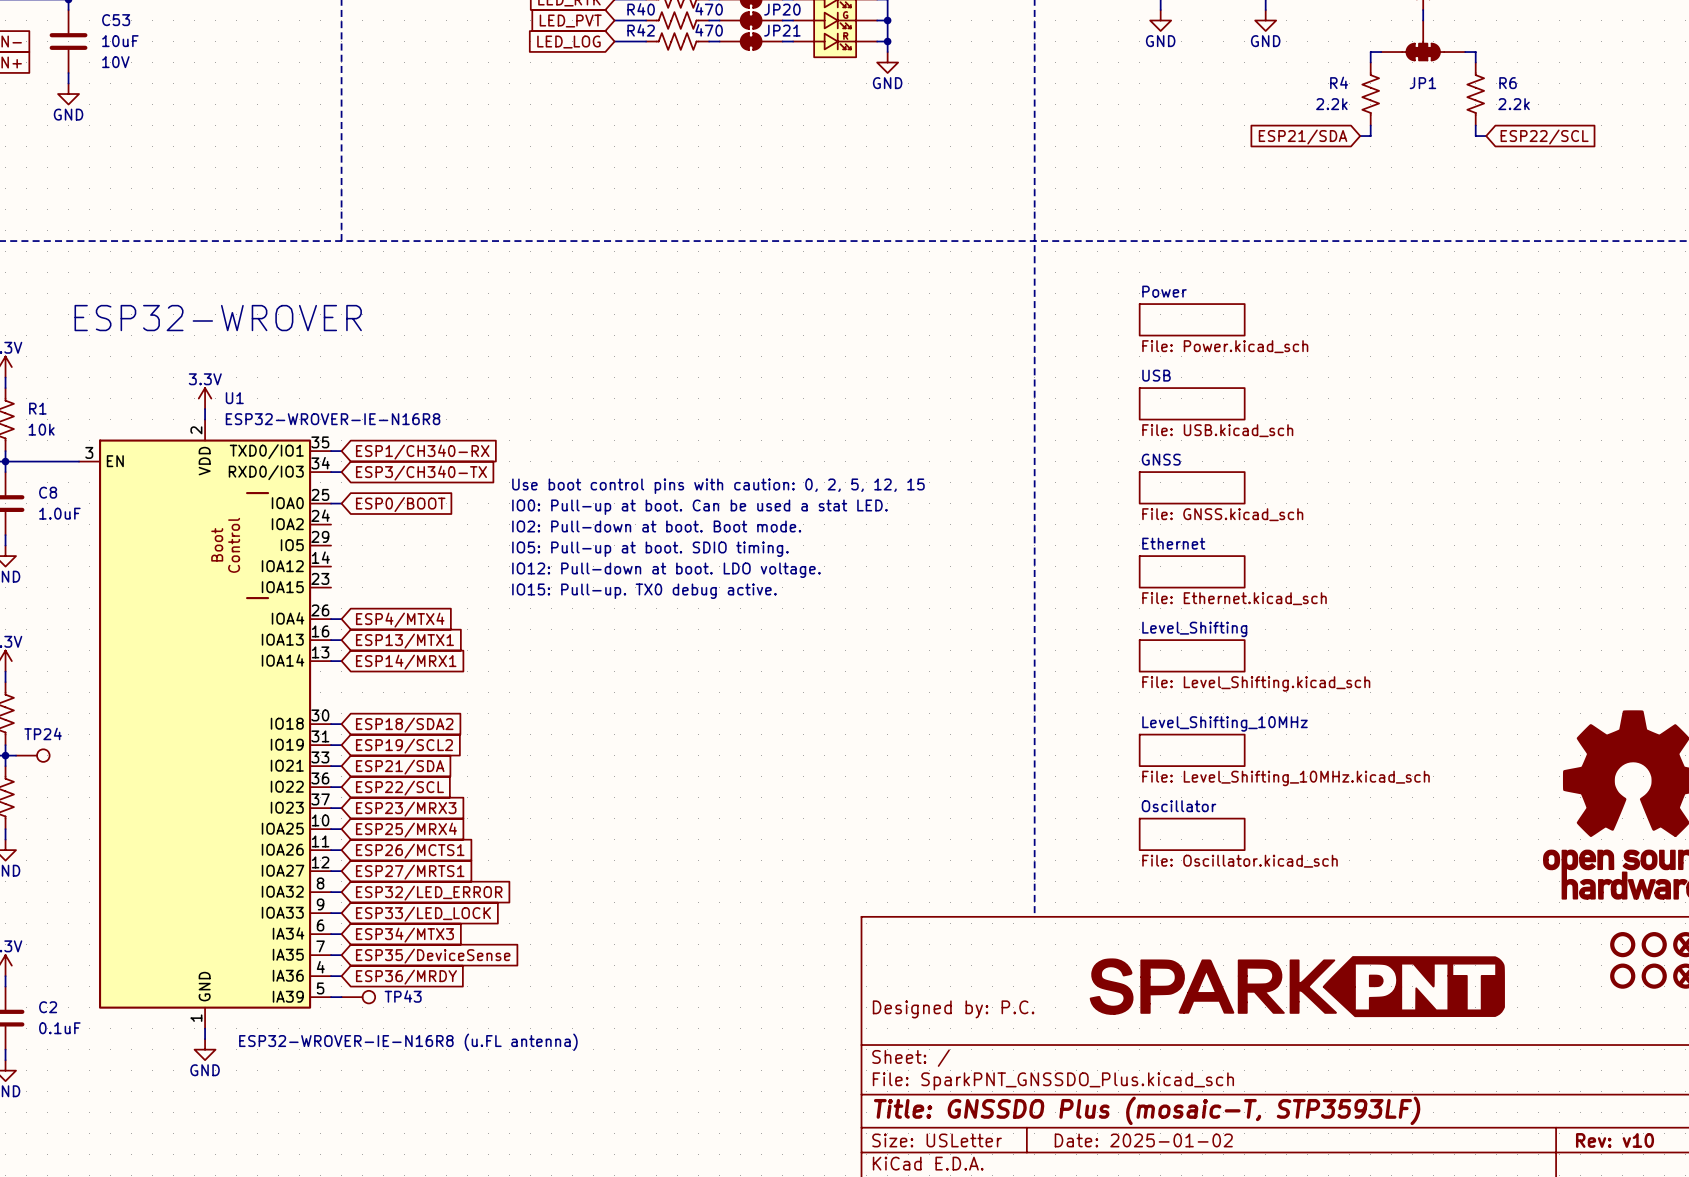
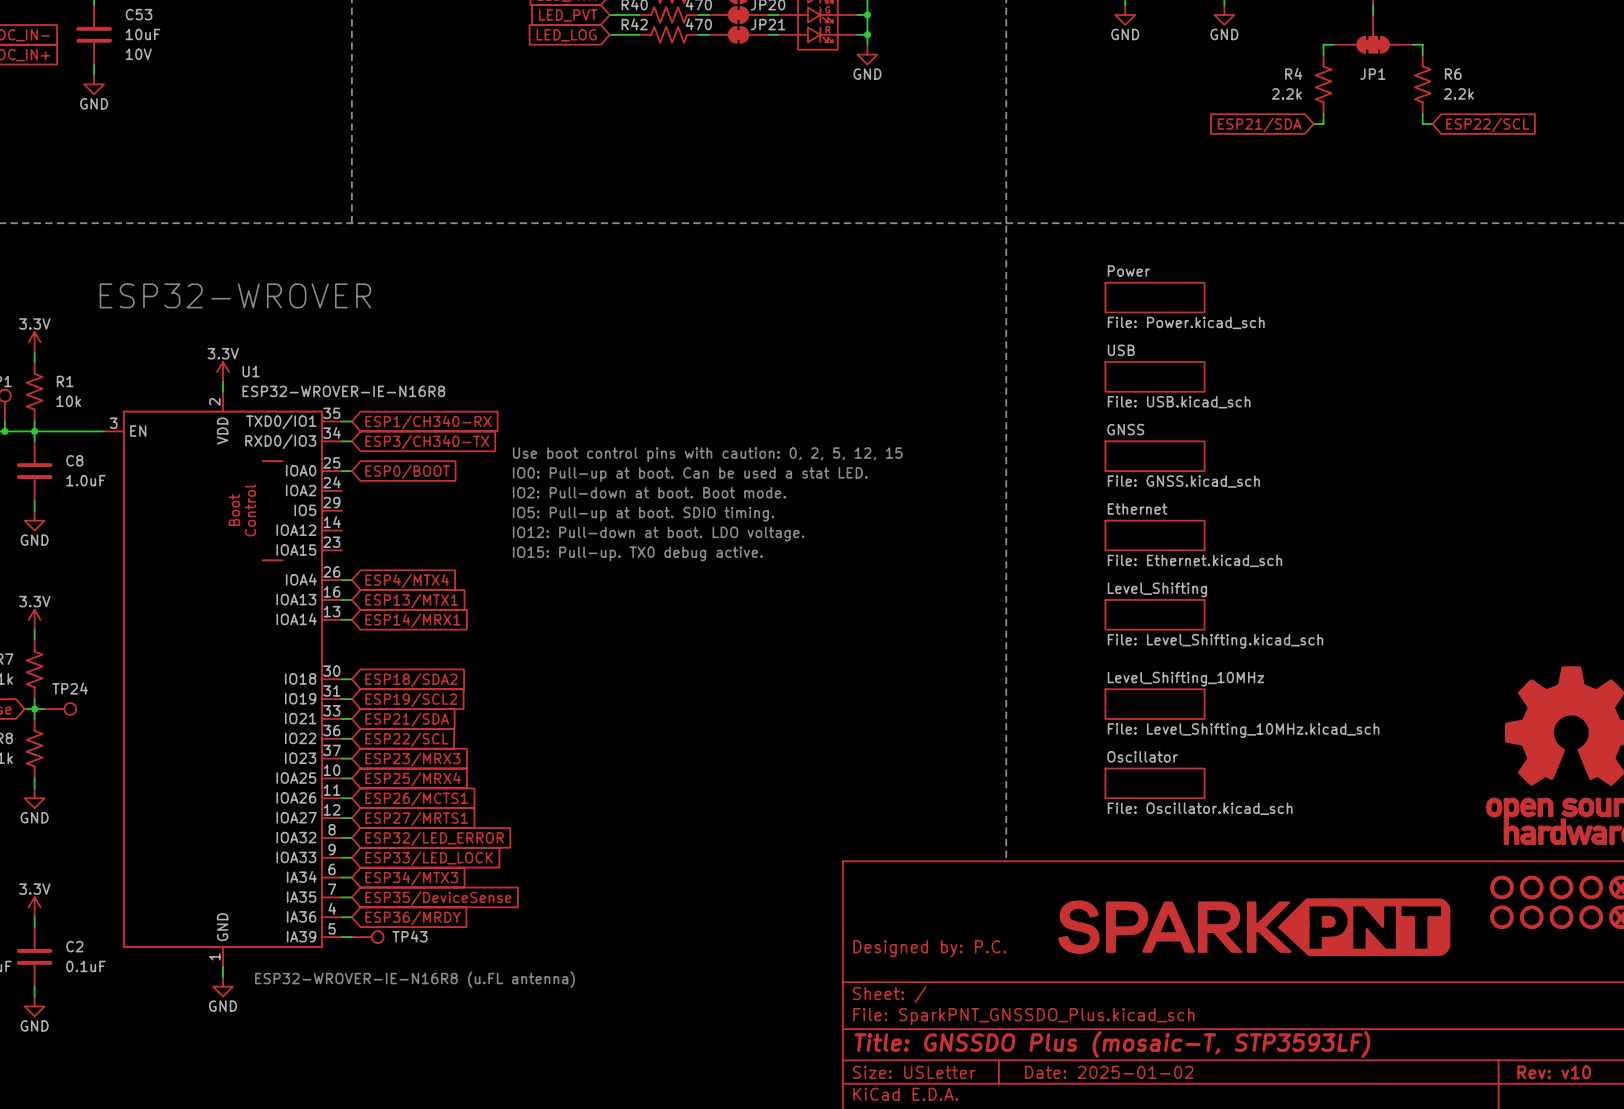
part: none -> (1502, 887)
part: none -> (1531, 887)
part: none -> (1502, 917)
part: none -> (1531, 917)

